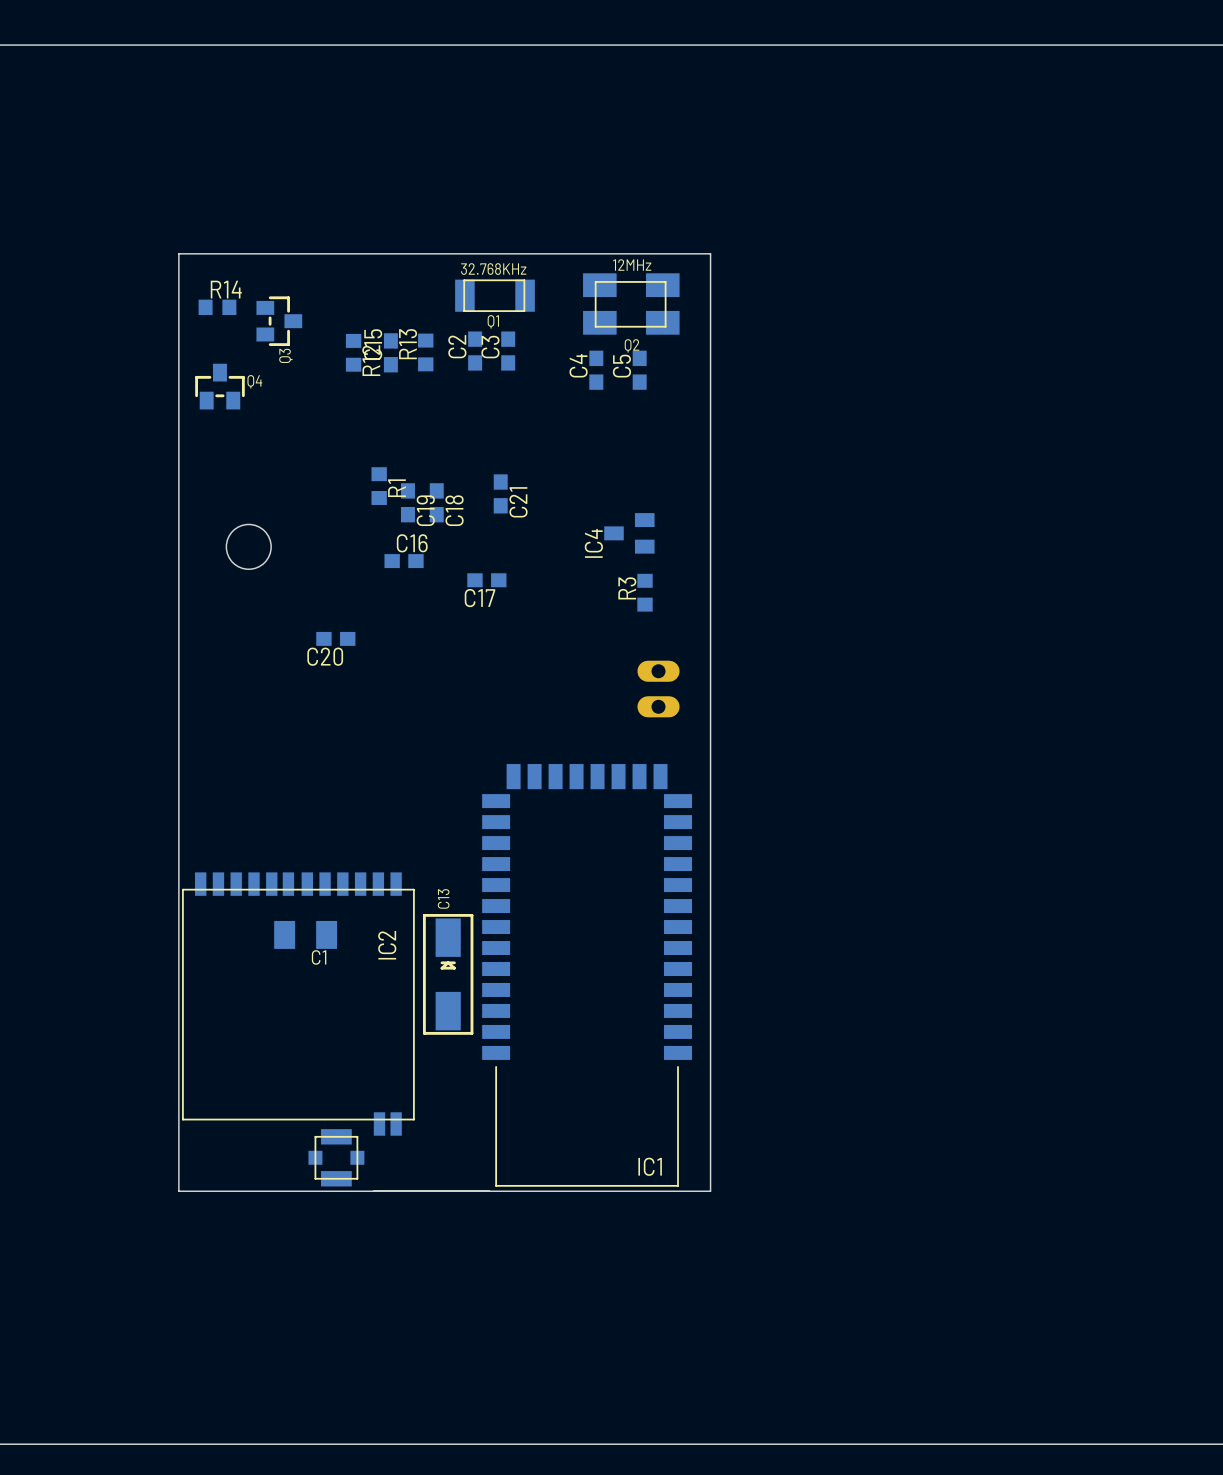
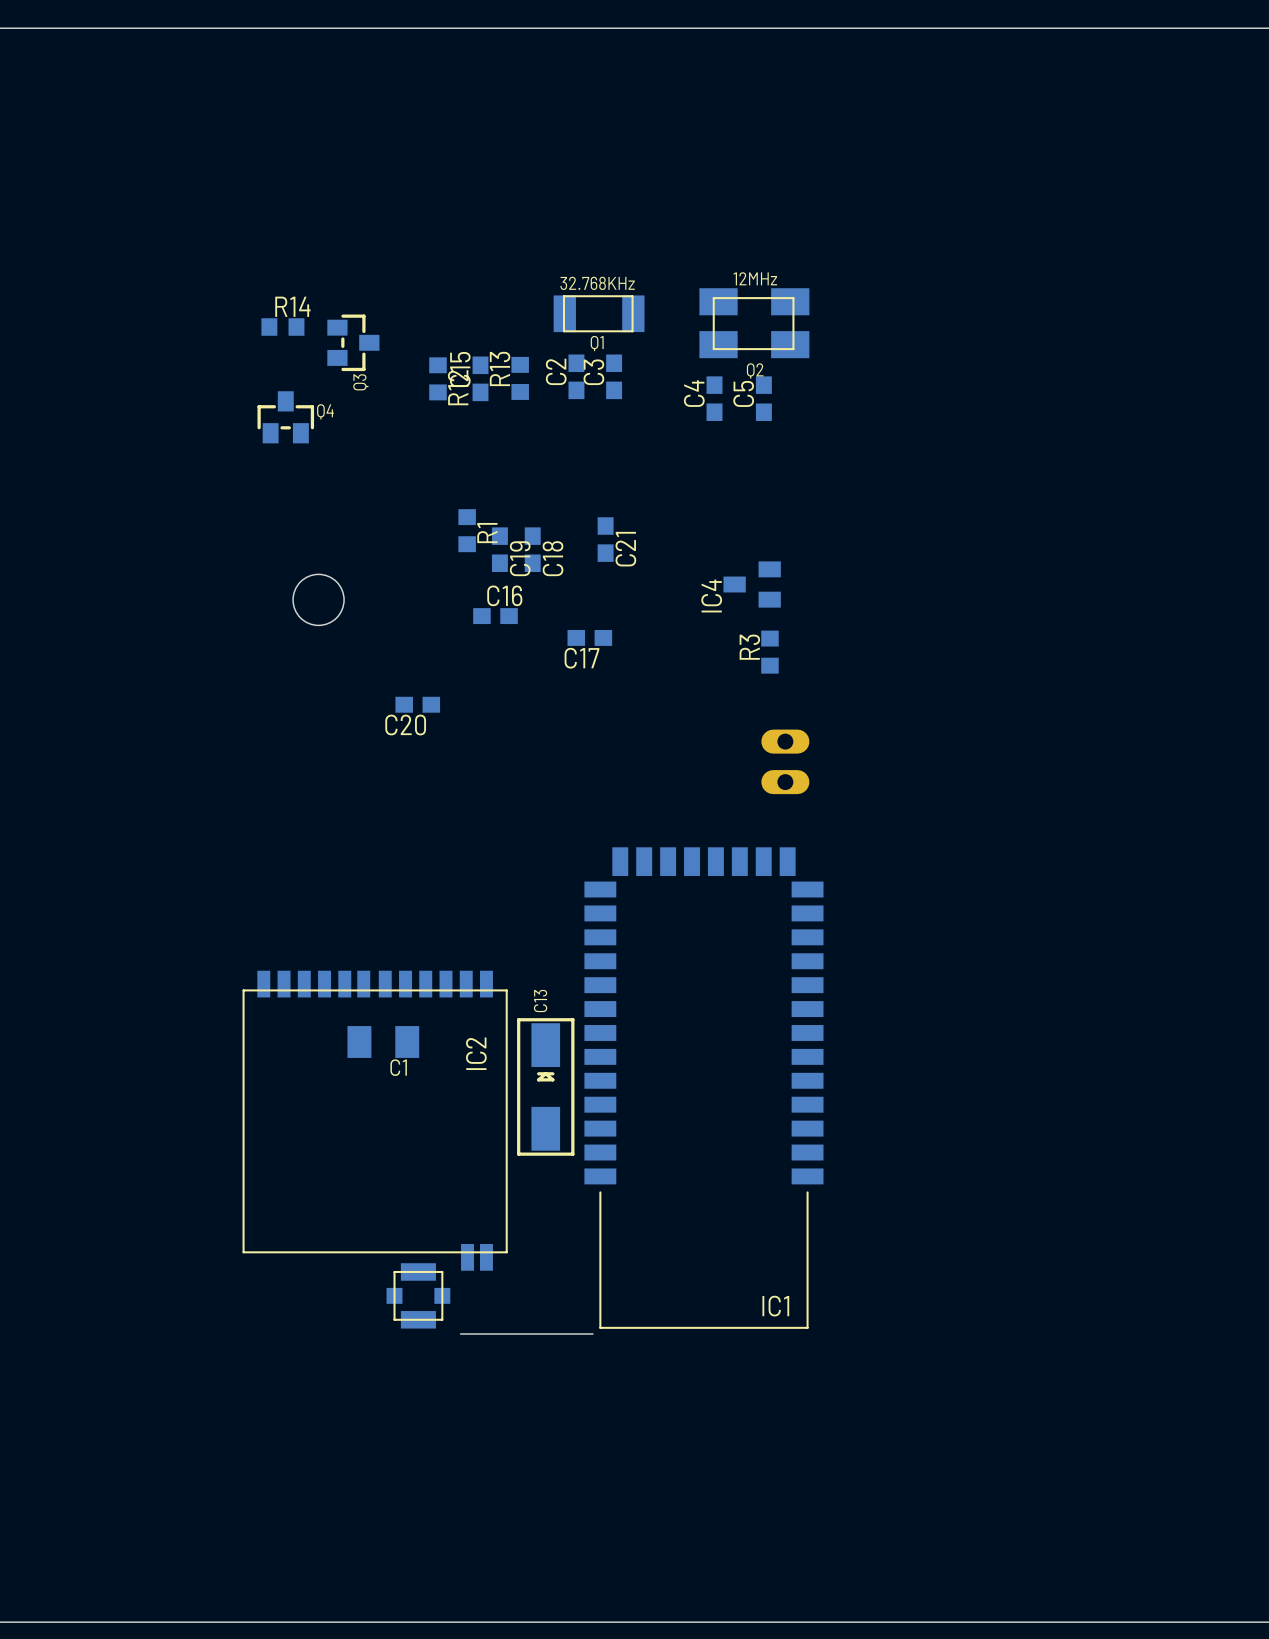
board edge: (710, 253) (178, 253) (178, 1191) (710, 1191) (710, 253) -> none

